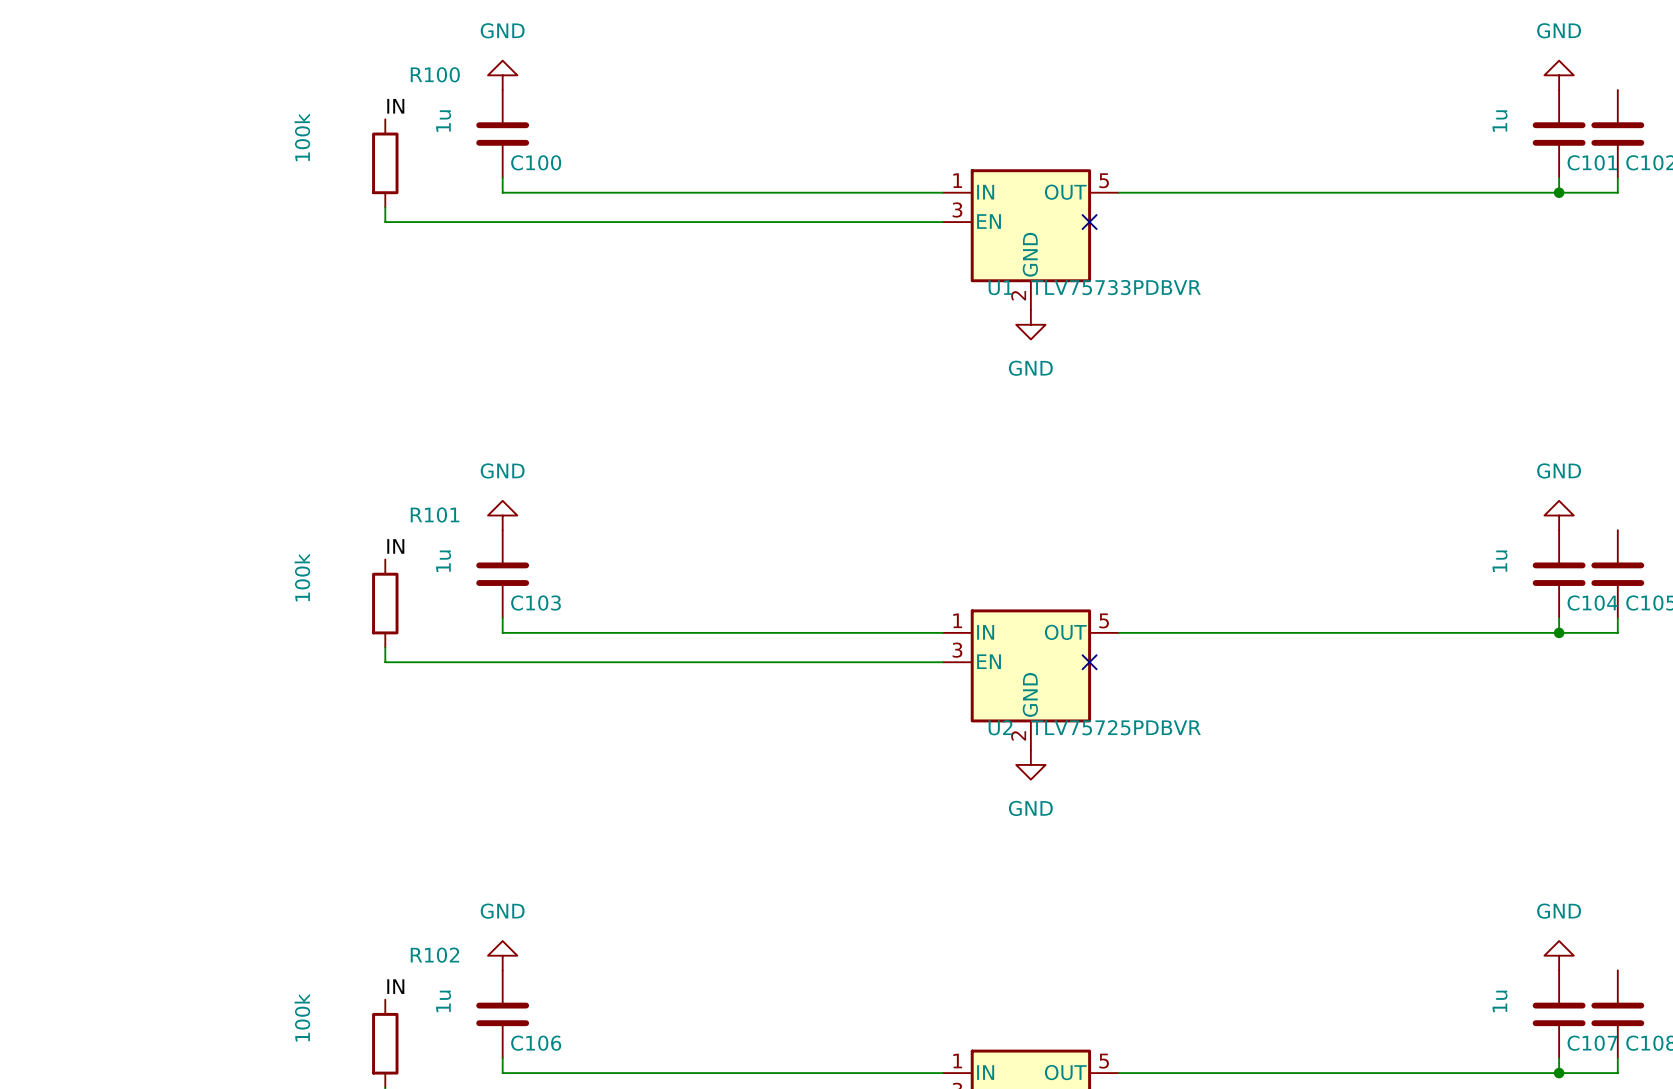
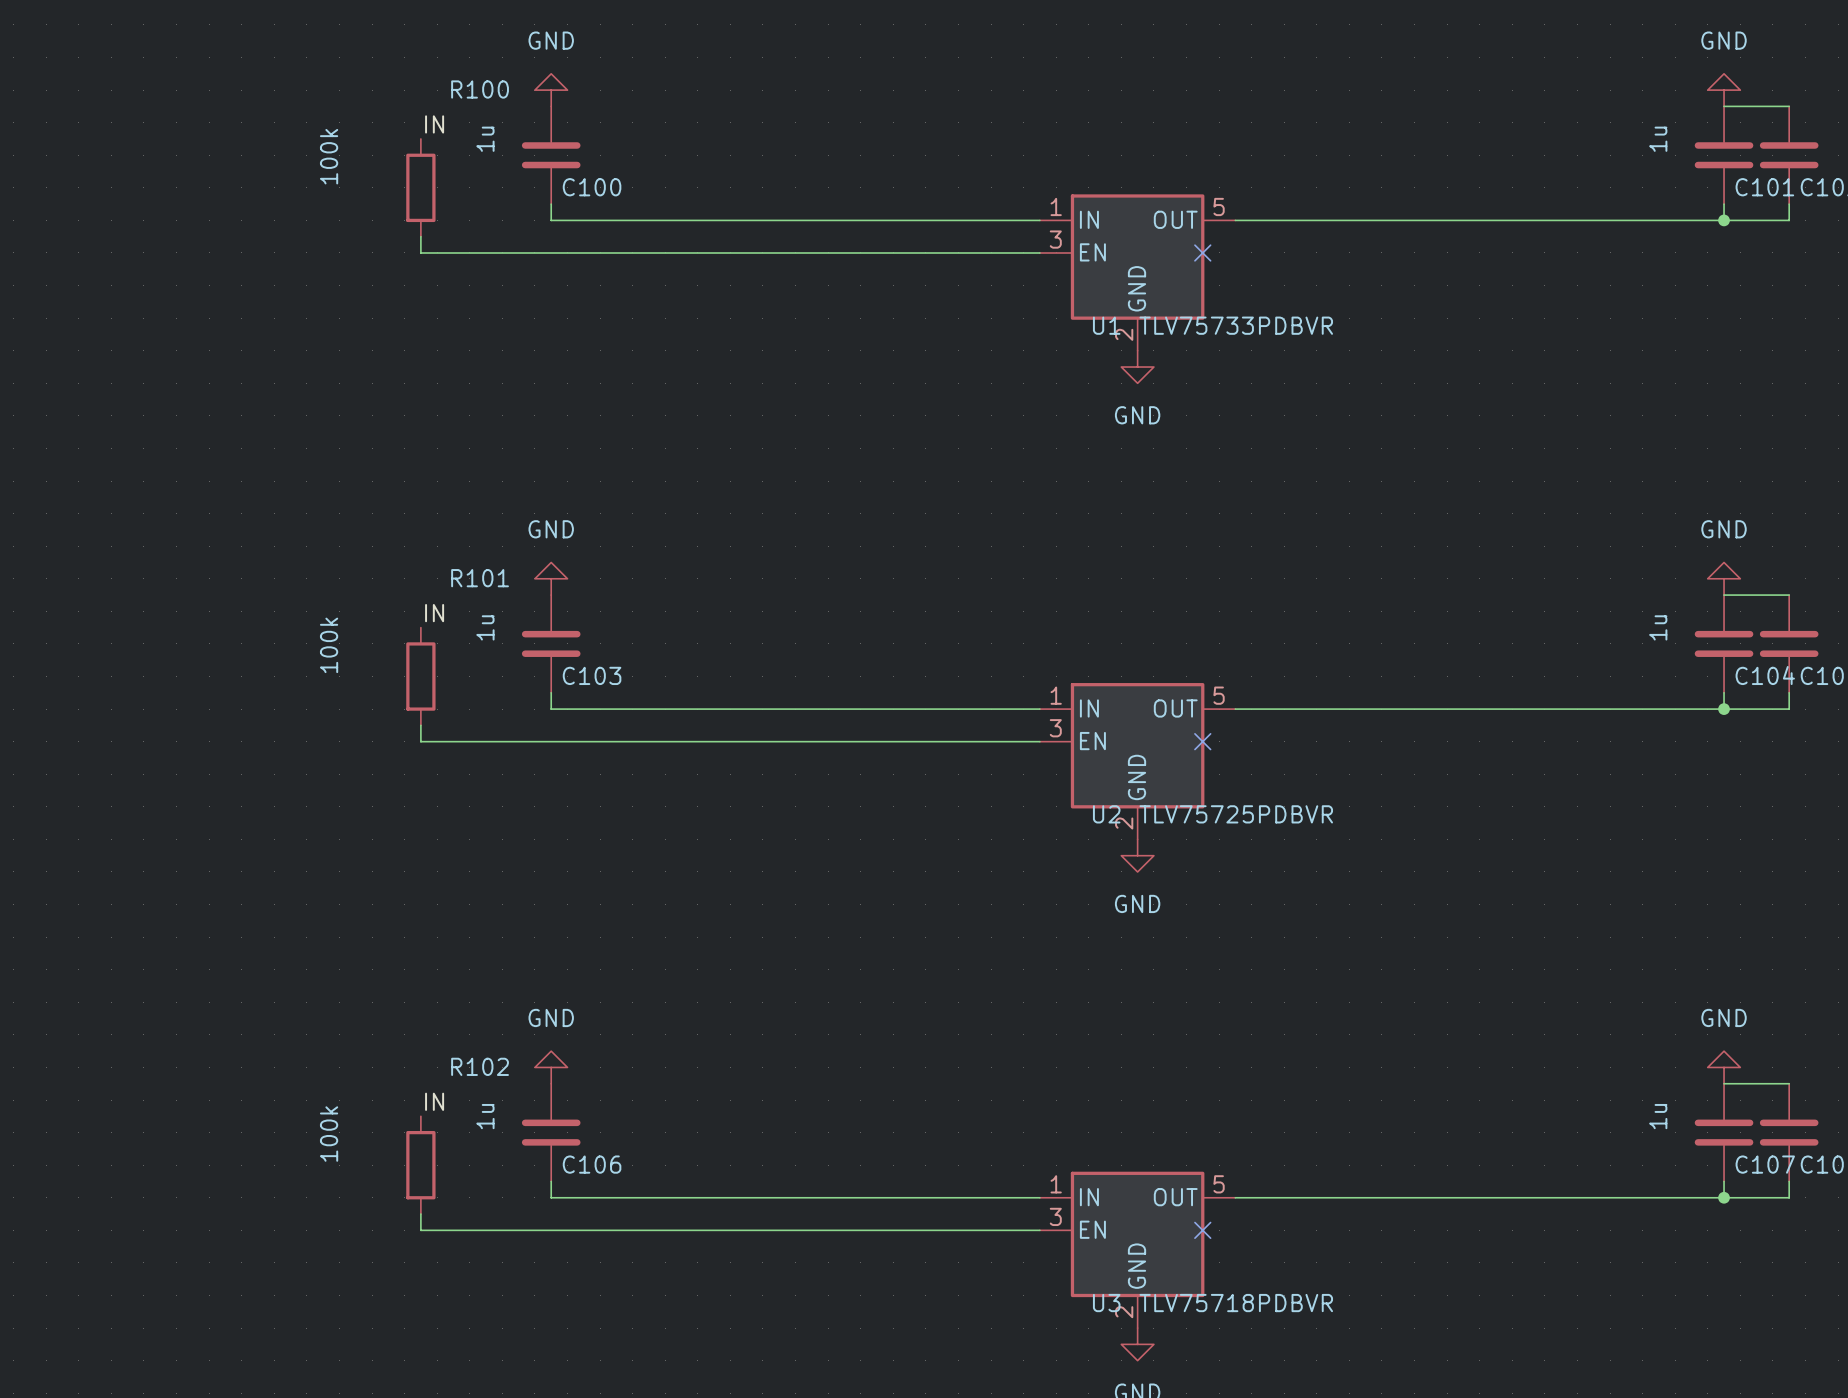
wire: none -> (1724, 106) (1789, 106)
wire: none -> (1724, 595) (1789, 595)
wire: none -> (1724, 1083) (1789, 1083)

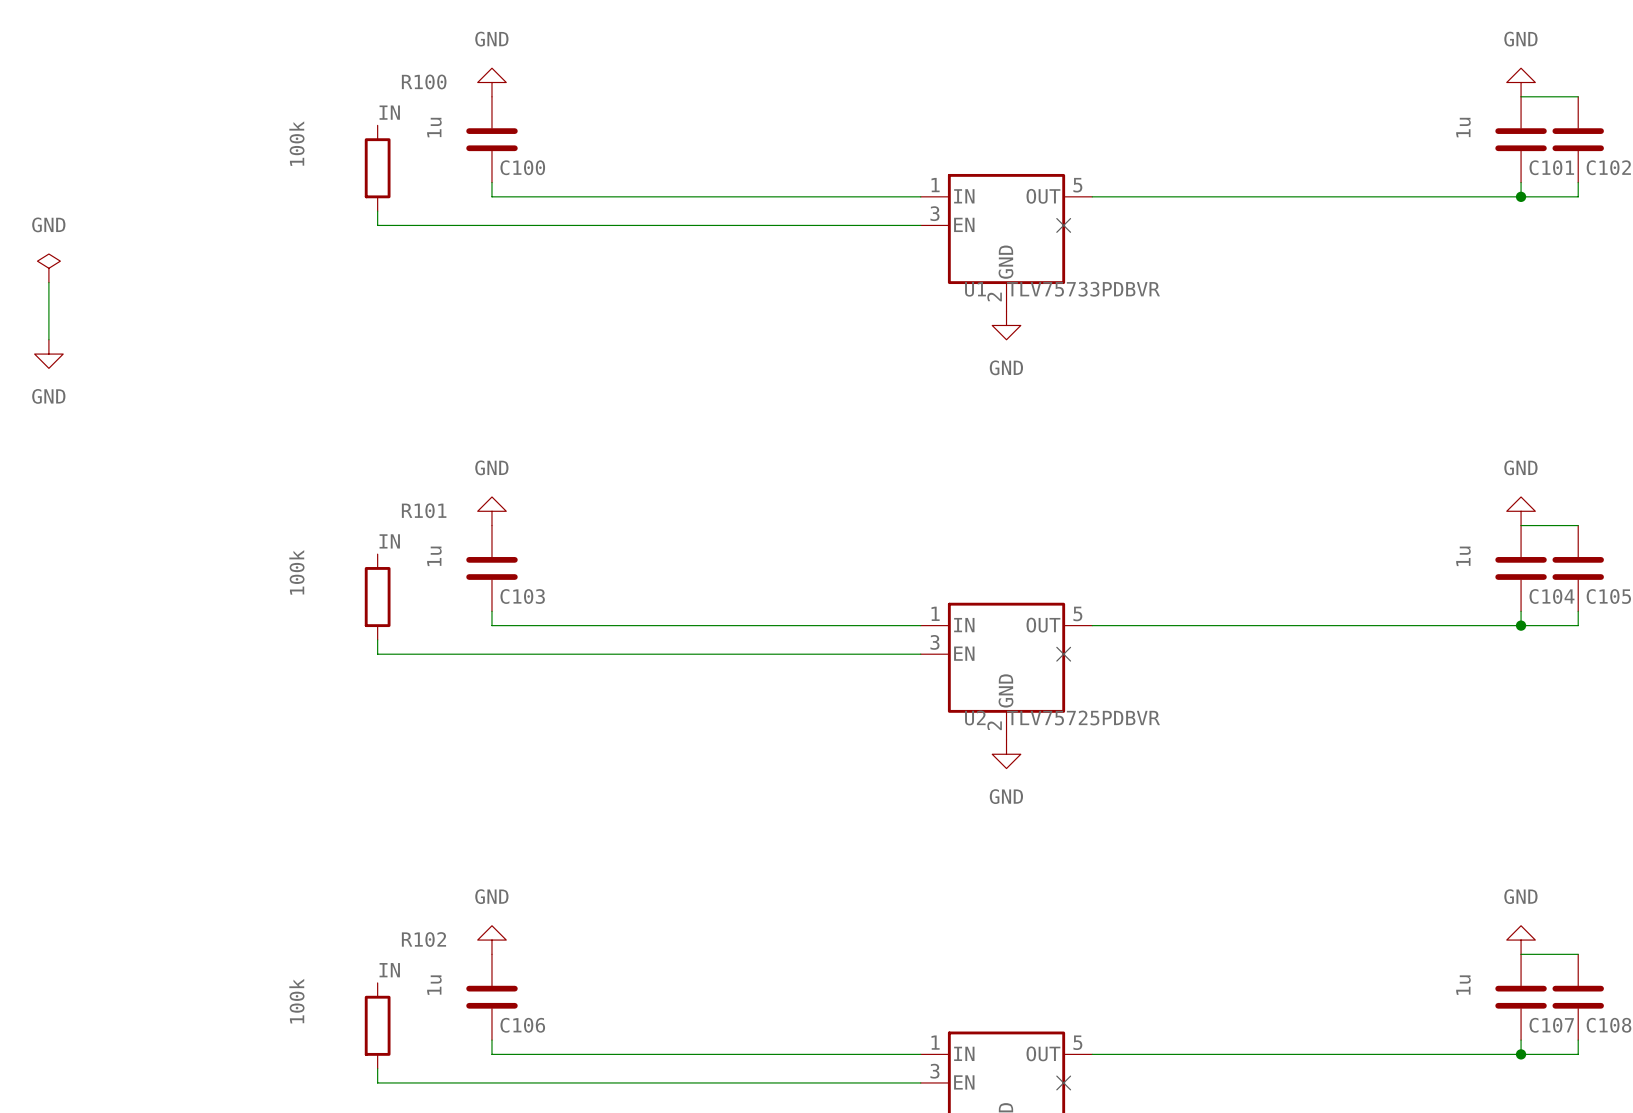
power symbol: none -> GND (48, 268)
wire: none -> (48, 282) (48, 339)
power symbol: none -> GND (48, 354)

